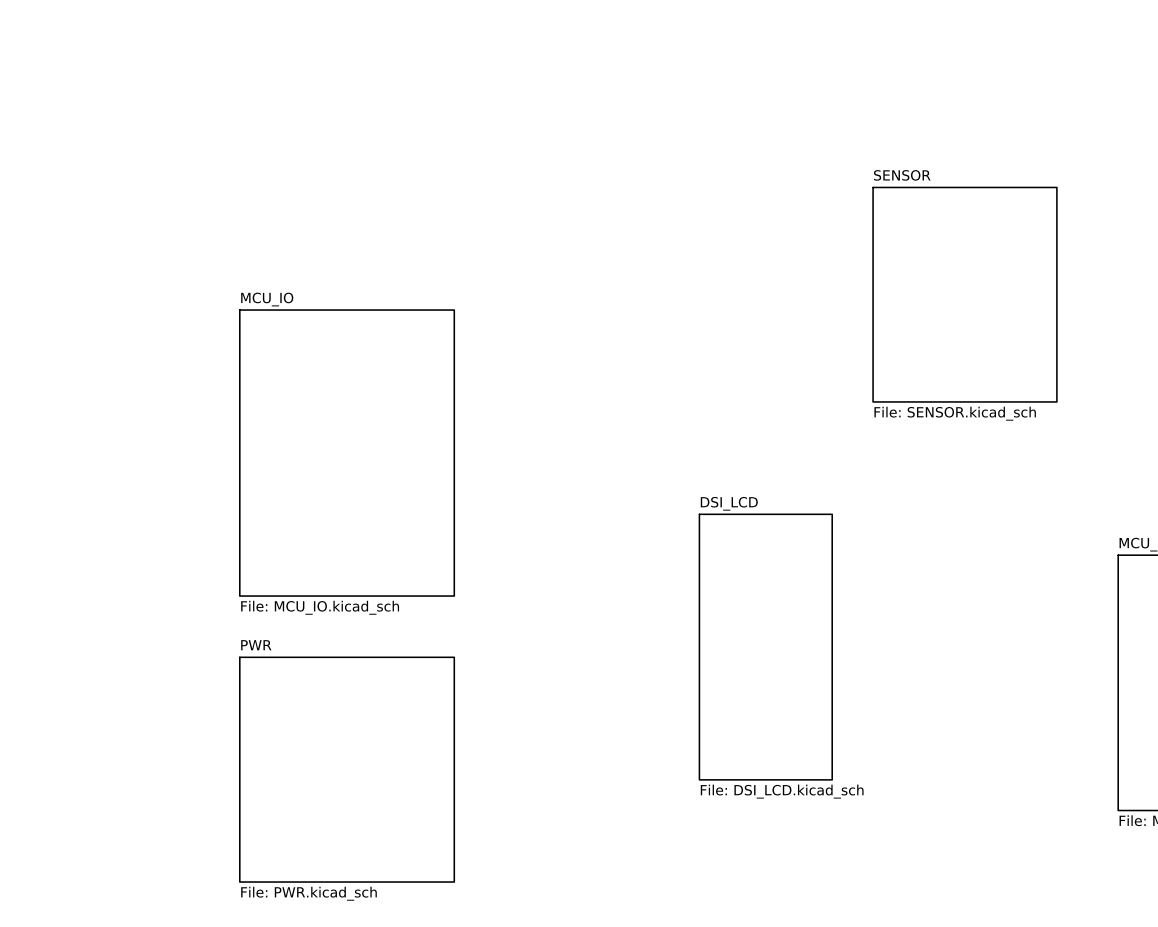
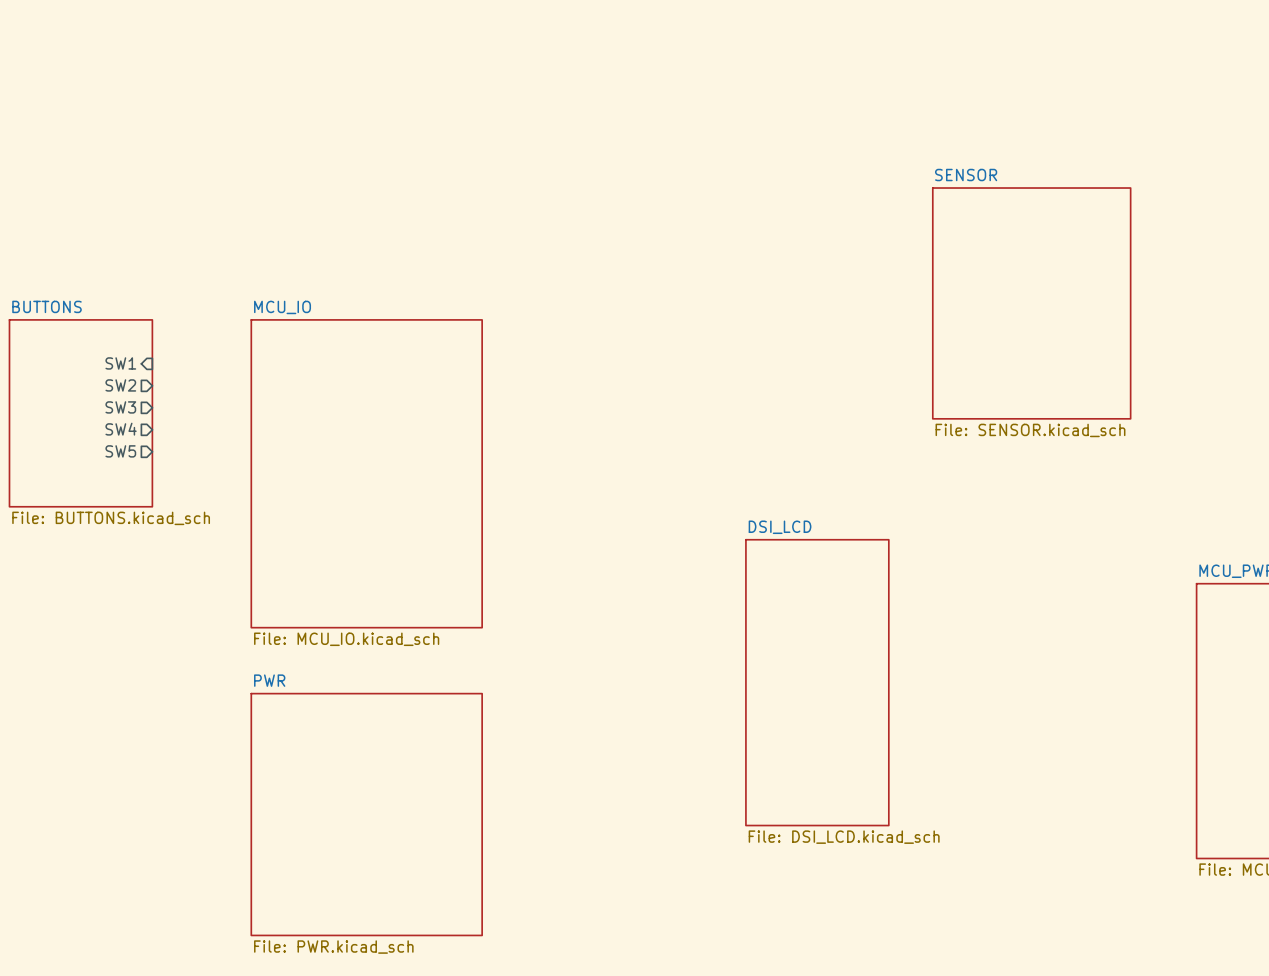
sheet pin: none -> SW1 (120, 363)
sheet pin: none -> SW2 (120, 385)
sheet pin: none -> SW3 (120, 407)
sheet BUTTONS: none -> File: BUTTONS.kicad_sch (80, 413)
sheet pin: none -> SW4 (121, 429)
sheet pin: none -> SW5 (120, 451)

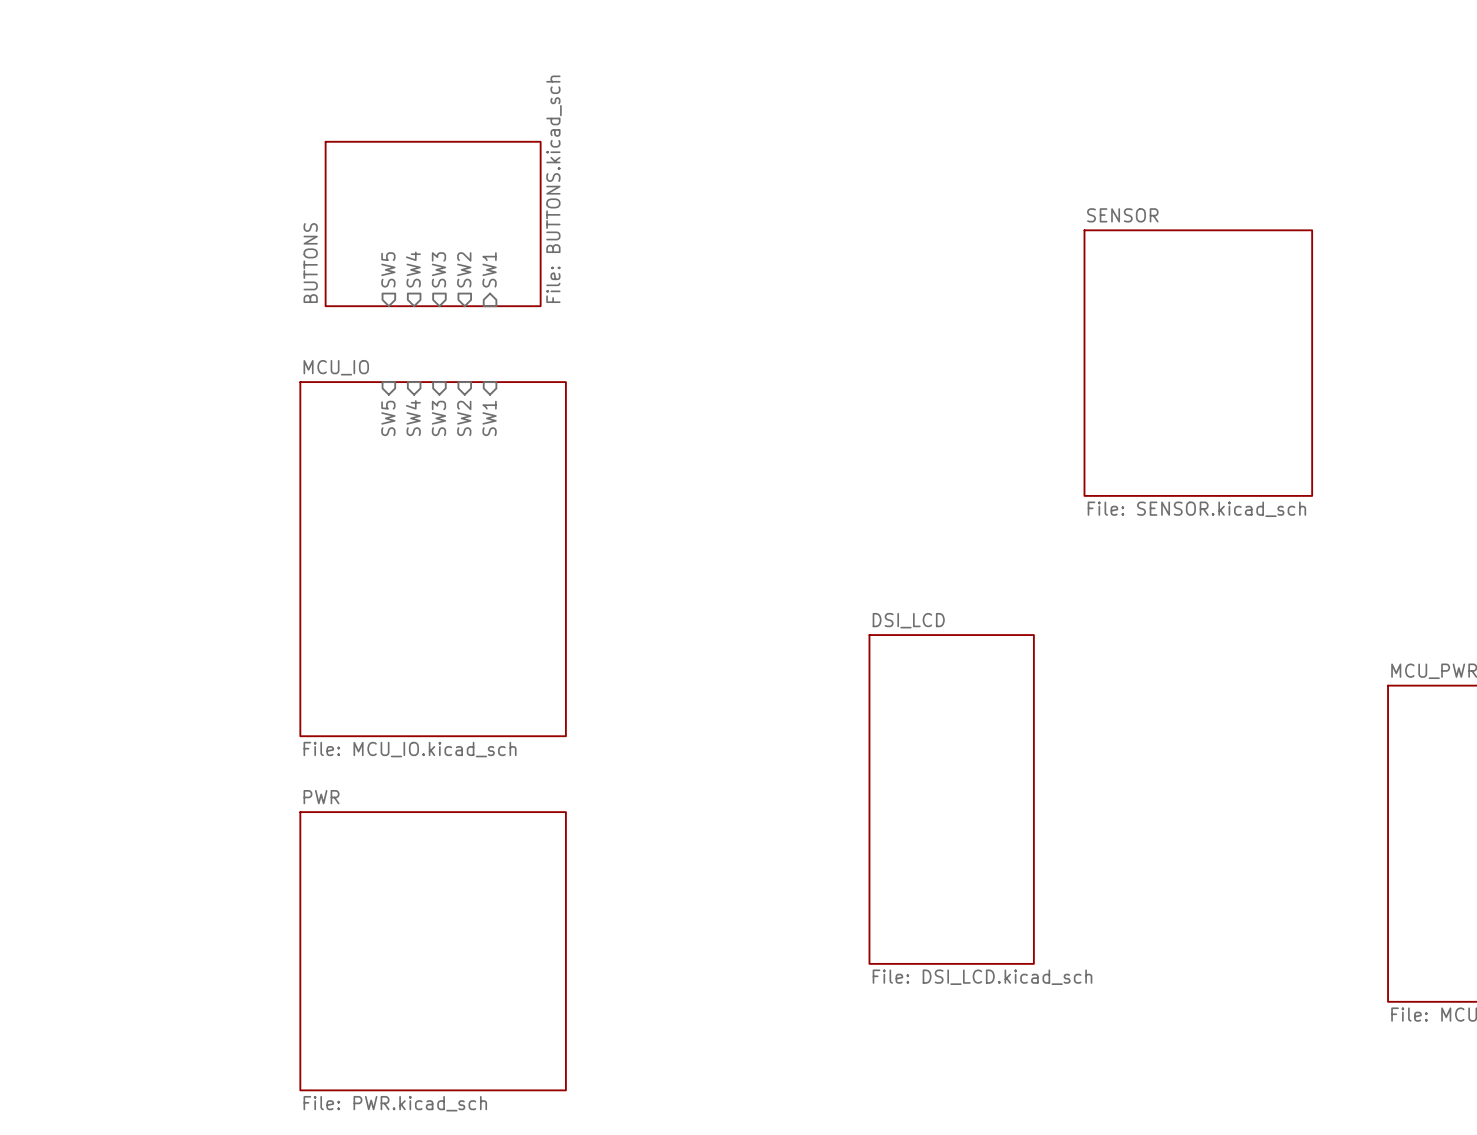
sheet BUTTONS: none -> File: BUTTONS.kicad_sch (433, 223)
sheet pin: none -> SW5 (388, 269)
sheet pin: none -> SW4 (413, 269)
sheet pin: none -> SW3 (438, 269)
sheet pin: none -> SW2 (464, 269)
sheet pin: none -> SW1 (489, 269)
sheet pin: none -> SW5 (388, 418)
sheet pin: none -> SW4 (413, 418)
sheet pin: none -> SW3 (438, 418)
sheet pin: none -> SW2 (464, 418)
sheet pin: none -> SW1 (489, 418)
sheet pin: SW1 (120, 363) -> none
sheet pin: SW2 (120, 385) -> none
sheet pin: SW3 (120, 407) -> none
sheet BUTTONS: File: BUTTONS.kicad_sch (80, 413) -> none
sheet pin: SW4 (121, 429) -> none
sheet pin: SW5 (120, 451) -> none

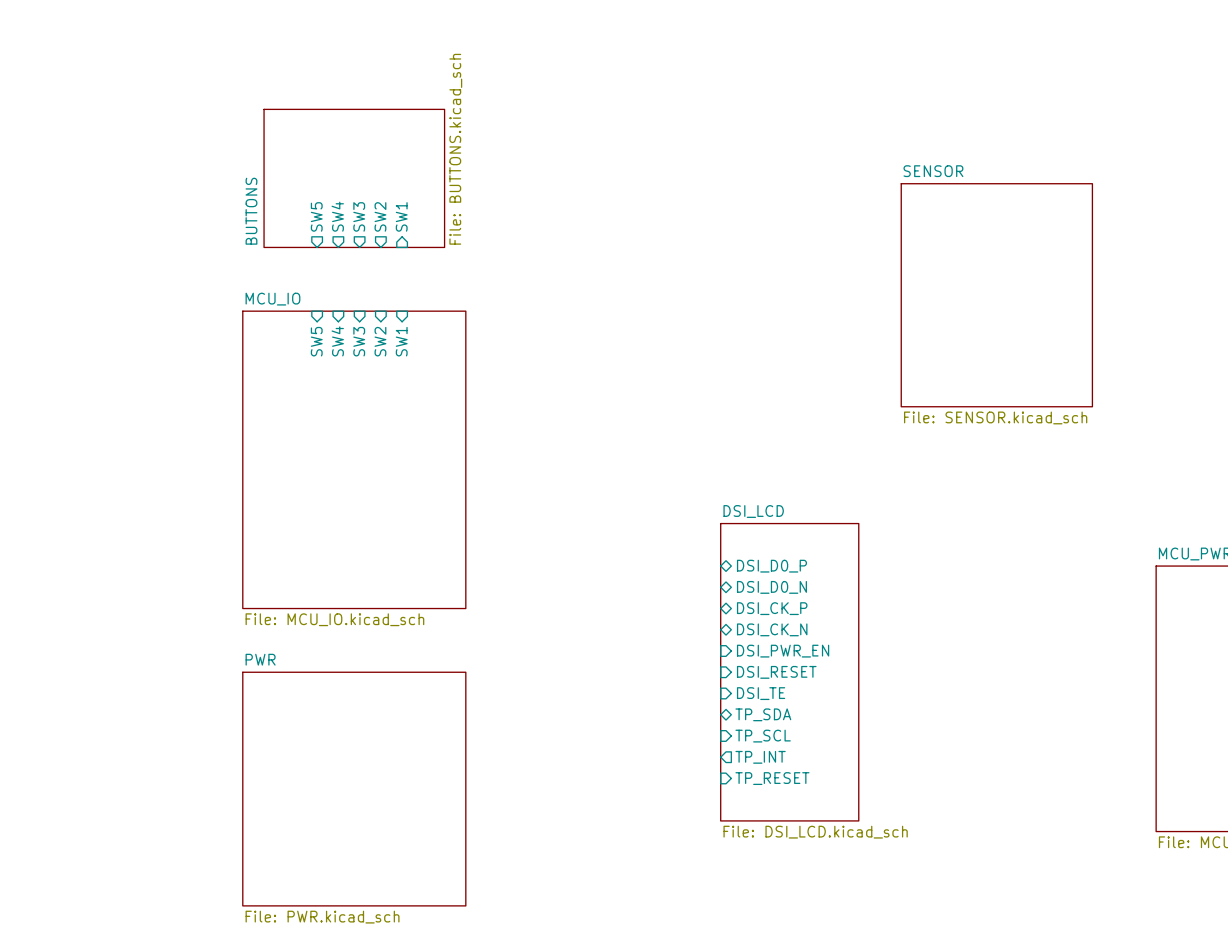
sheet pin: none -> DSI_D0_P (771, 566)
sheet pin: none -> DSI_D0_N (771, 587)
sheet pin: none -> DSI_CK_P (772, 608)
sheet pin: none -> DSI_CK_N (772, 629)
sheet pin: none -> DSI_PWR_EN (783, 651)
sheet DSI_LCD: File: DSI_LCD.kicad_sch (951, 799) -> none
sheet pin: none -> DSI_RESET (776, 672)
sheet DSI_LCD: none -> File: DSI_LCD.kicad_sch (789, 672)
sheet pin: none -> DSI_TE (761, 693)
sheet pin: none -> TP_SDA (763, 714)
sheet pin: none -> TP_SCL (763, 736)
sheet pin: none -> TP_INT (760, 757)
sheet pin: none -> TP_RESET (772, 778)

